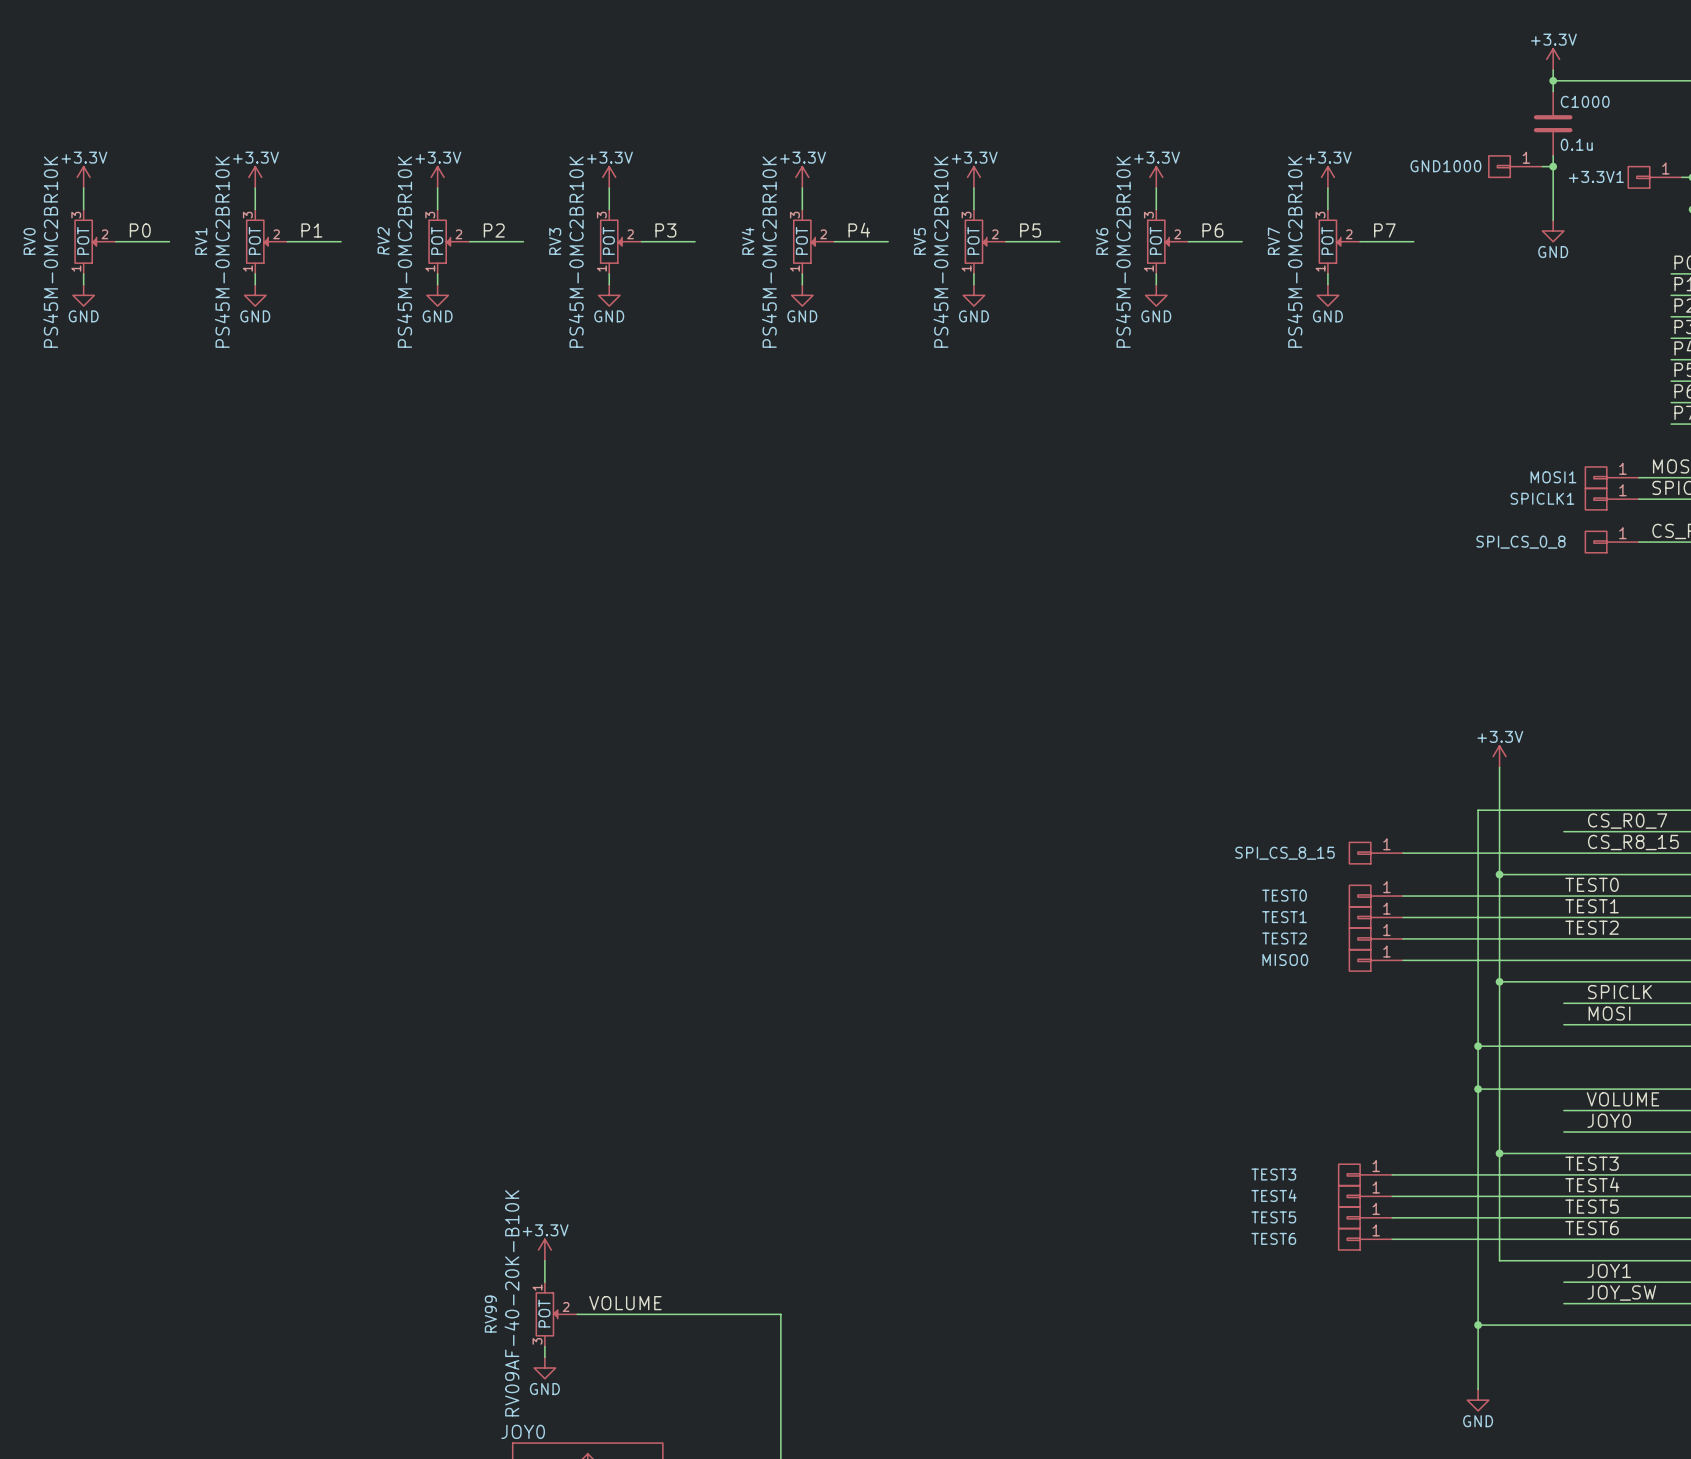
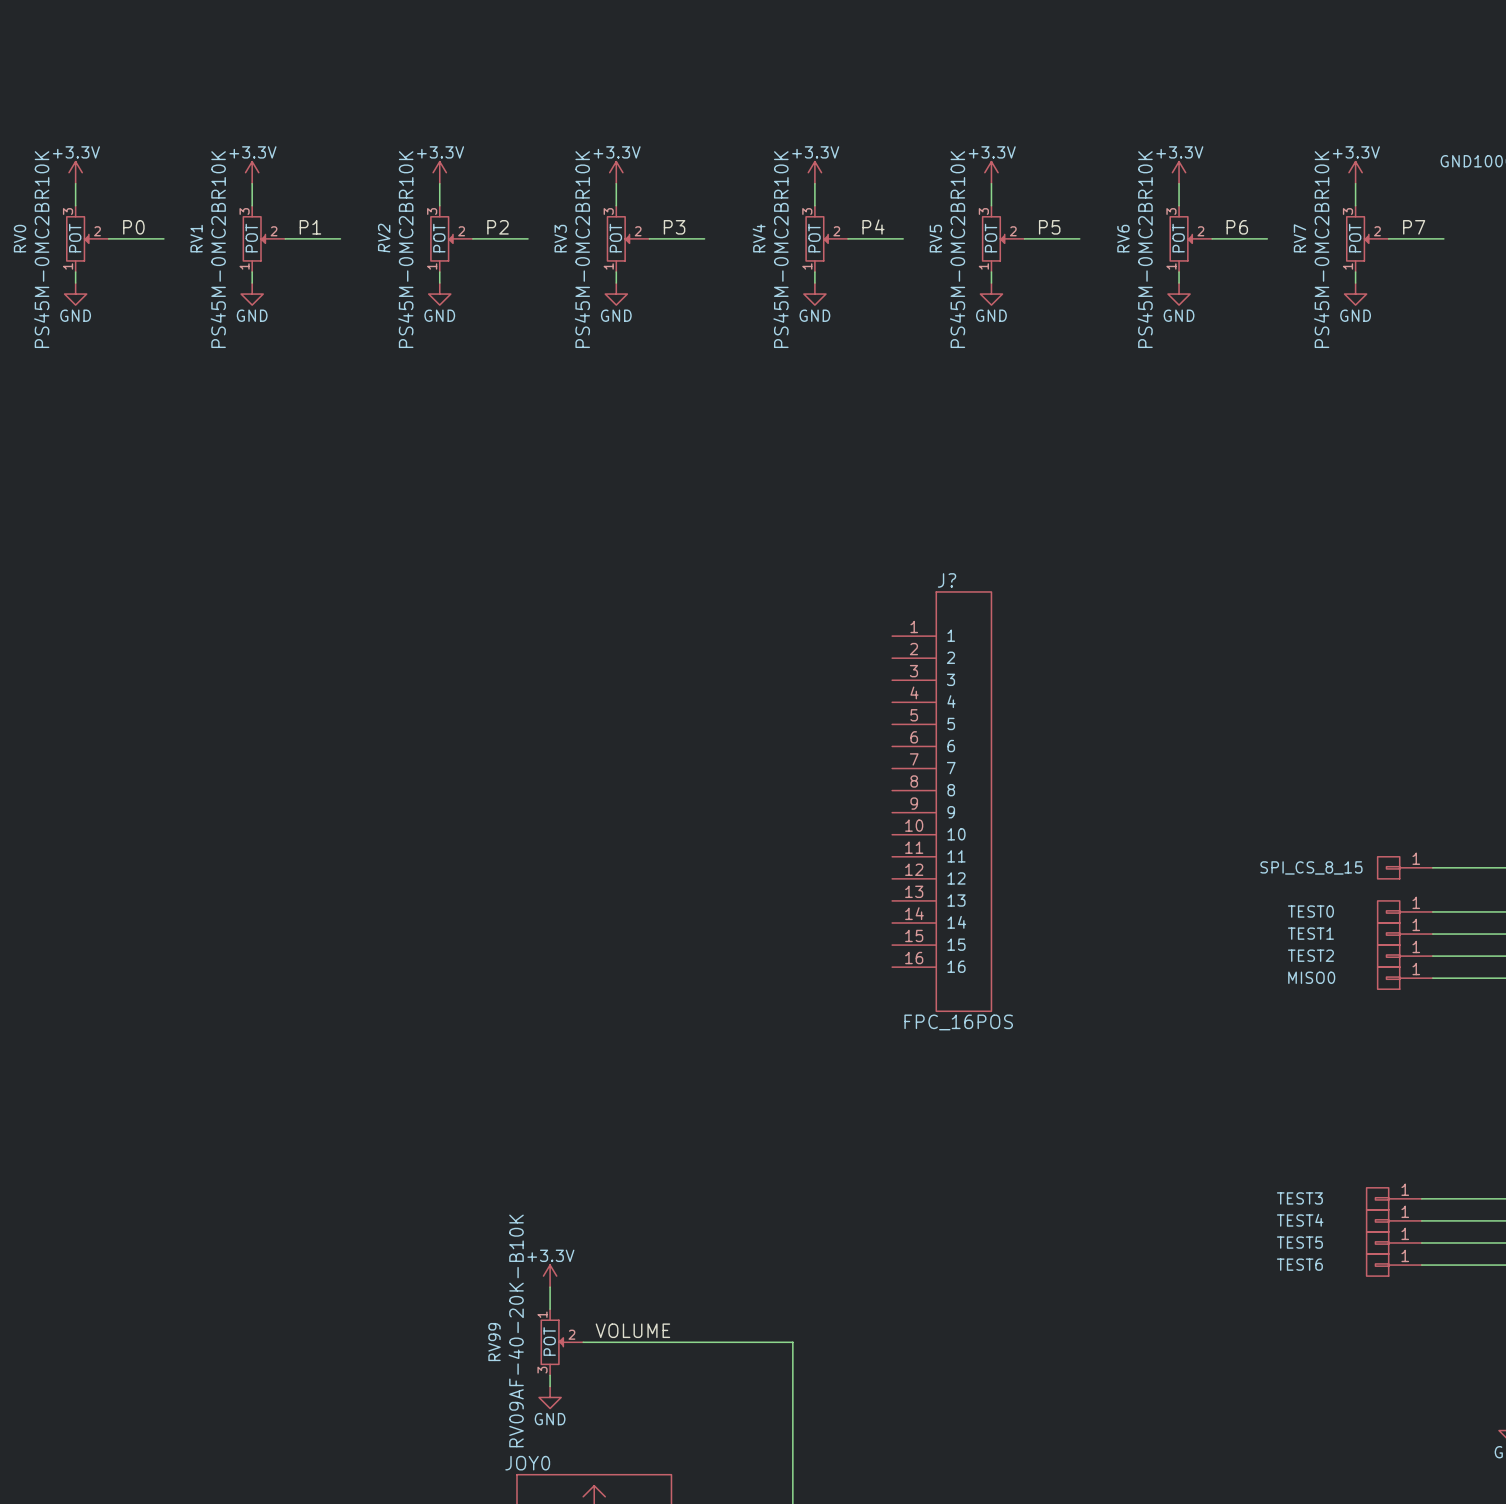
J?: none -> FPC_16POS (941, 801)

